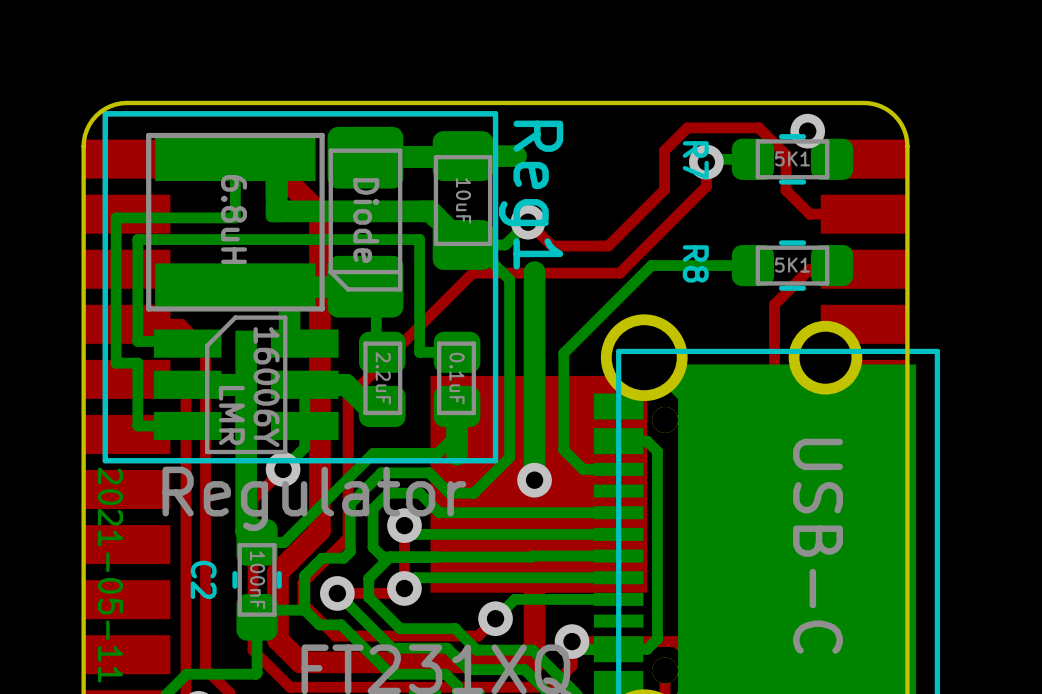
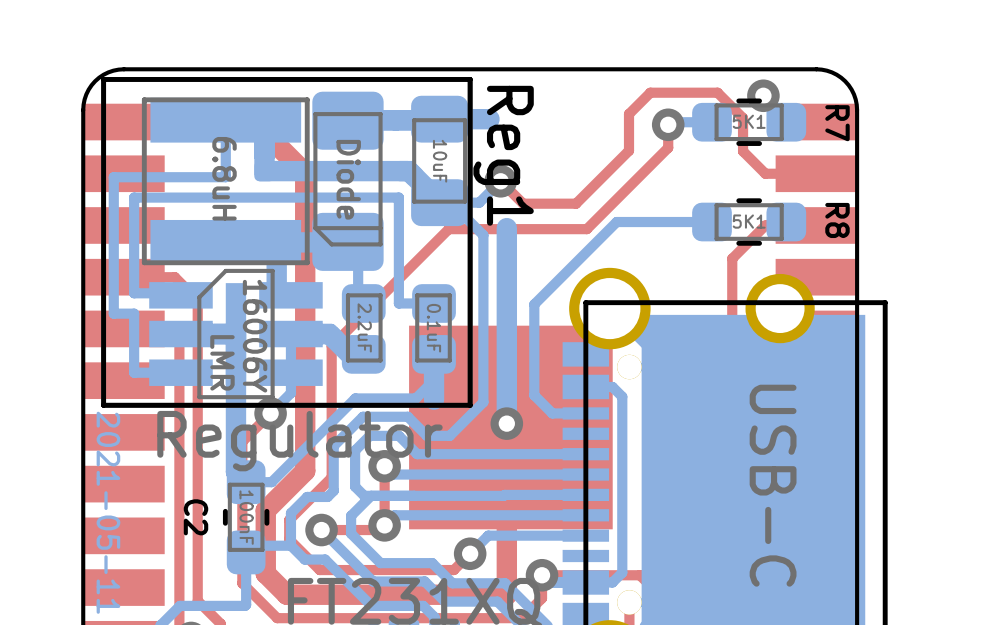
R7 name position: R7 (695, 160) -> R7 (837, 123)
R8 name position: R8 (695, 263) -> R8 (837, 220)

